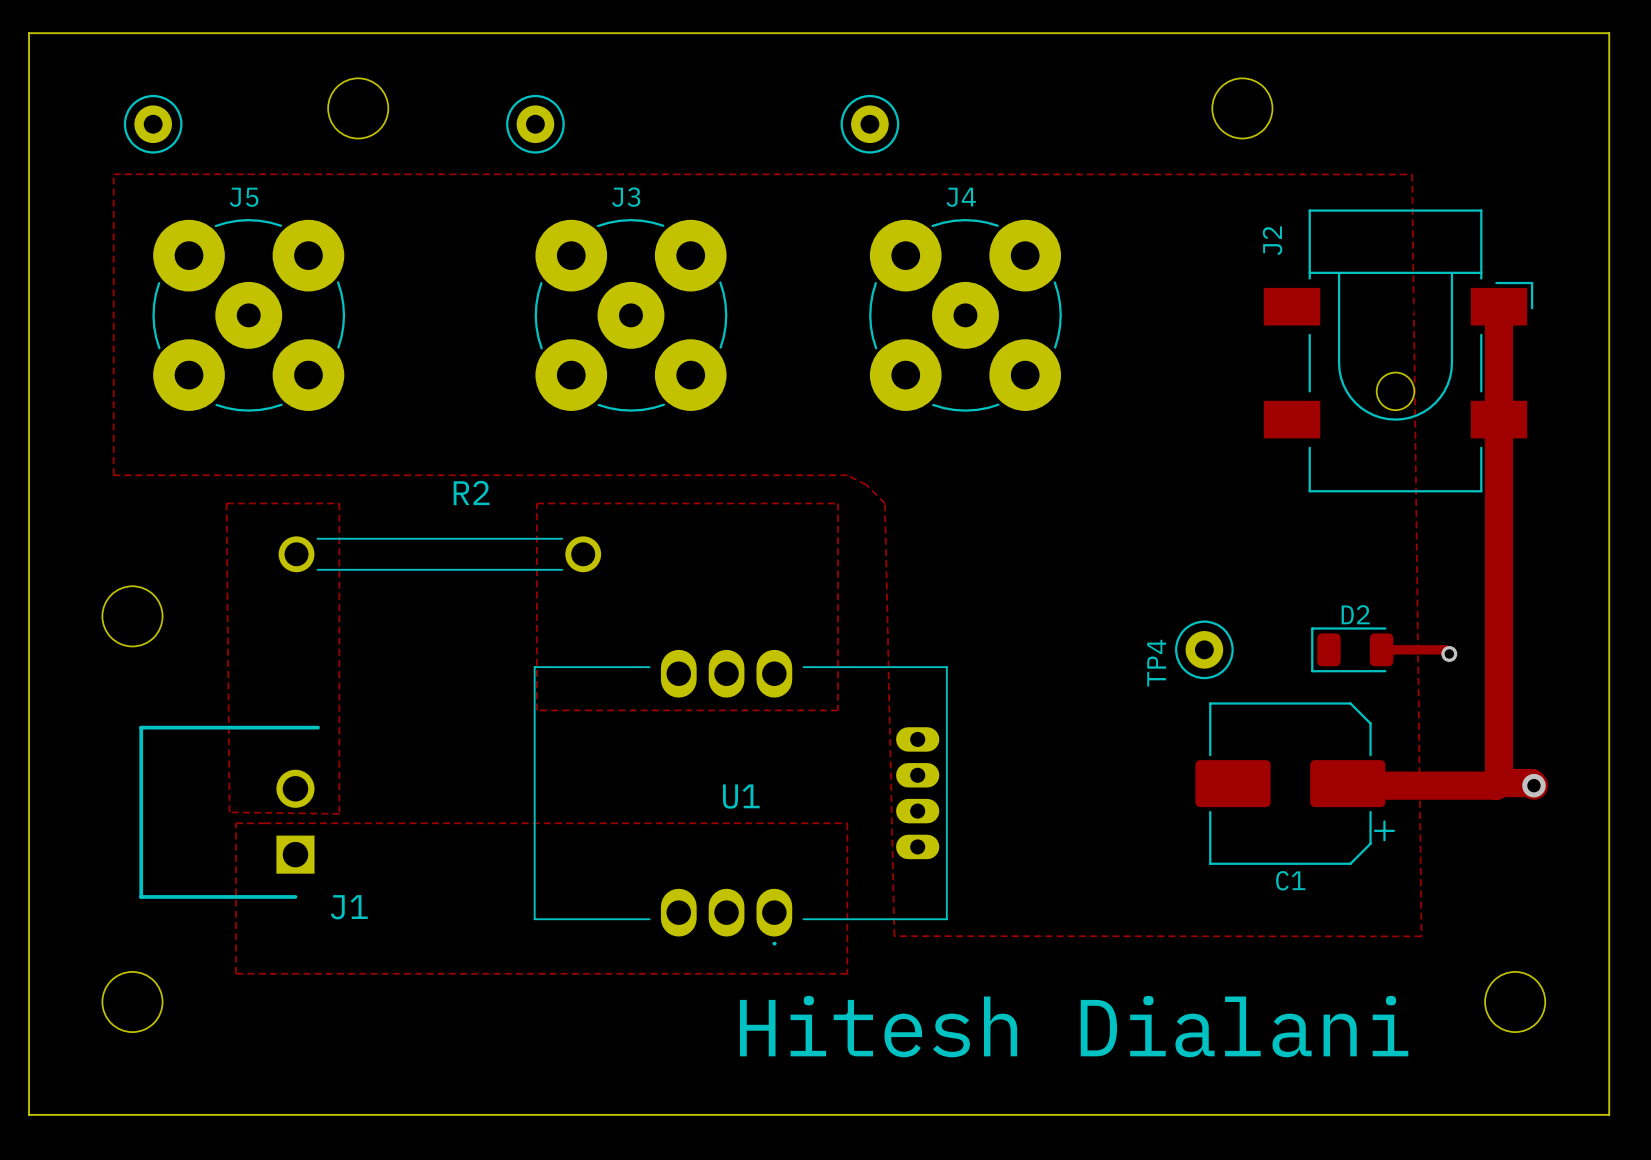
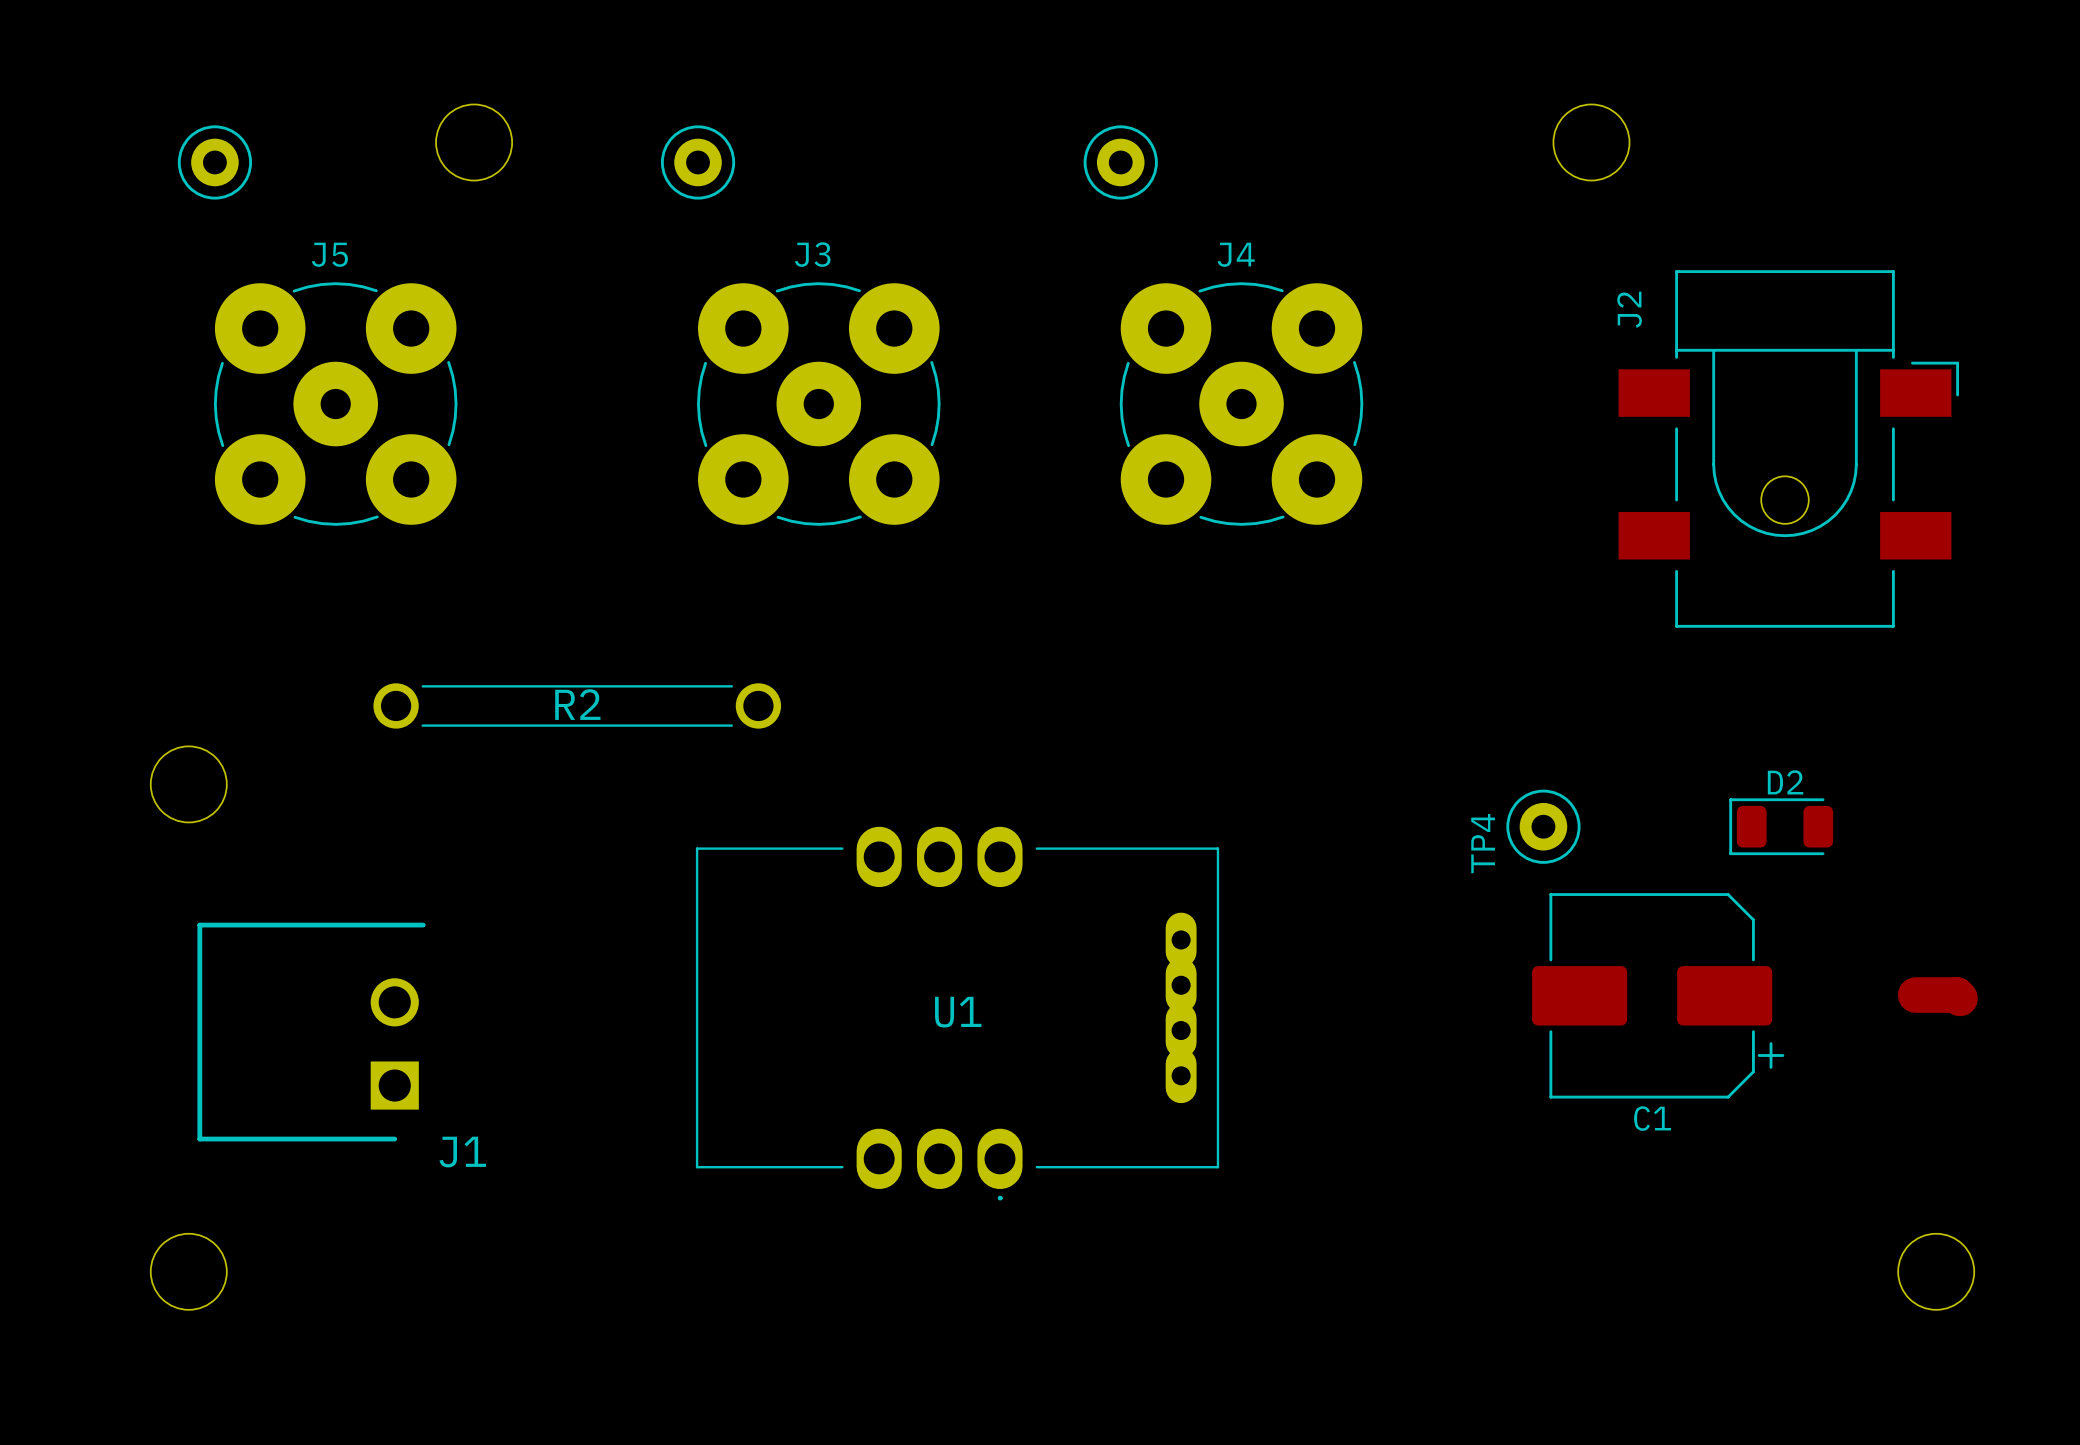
board edge: (29, 33) (29, 1114) (1609, 1114) (1609, 33) (29, 33) -> none
zone outline: (113, 174) (113, 475) (847, 475) (866, 484) (884, 503) (894, 936) (1421, 936) (1412, 174) (113, 174) -> none
track: (1498, 306) (1498, 783) (1496, 785) (1349, 785) (1347, 783) -> none
R2 name position: R2 (471, 492) -> R2 (577, 704)
zone outline: (226, 503) (229, 812) (339, 813) (339, 503) (226, 503) -> none
zone outline: (536, 503) (837, 503) (837, 710) (536, 710) (536, 503) -> none
U1 footprint: [533, 649, 948, 946] -> [695, 826, 1220, 1201]
D2 position: (1352, 649) -> (1781, 826)
track: (1381, 649) (1445, 649) (1449, 653) -> none
via: (1449, 653) -> none
via: (1533, 785) -> none
zone outline: (235, 823) (235, 973) (847, 973) (847, 823) (235, 823) -> none
text: Hitesh Dialani (1074, 1026) -> none

